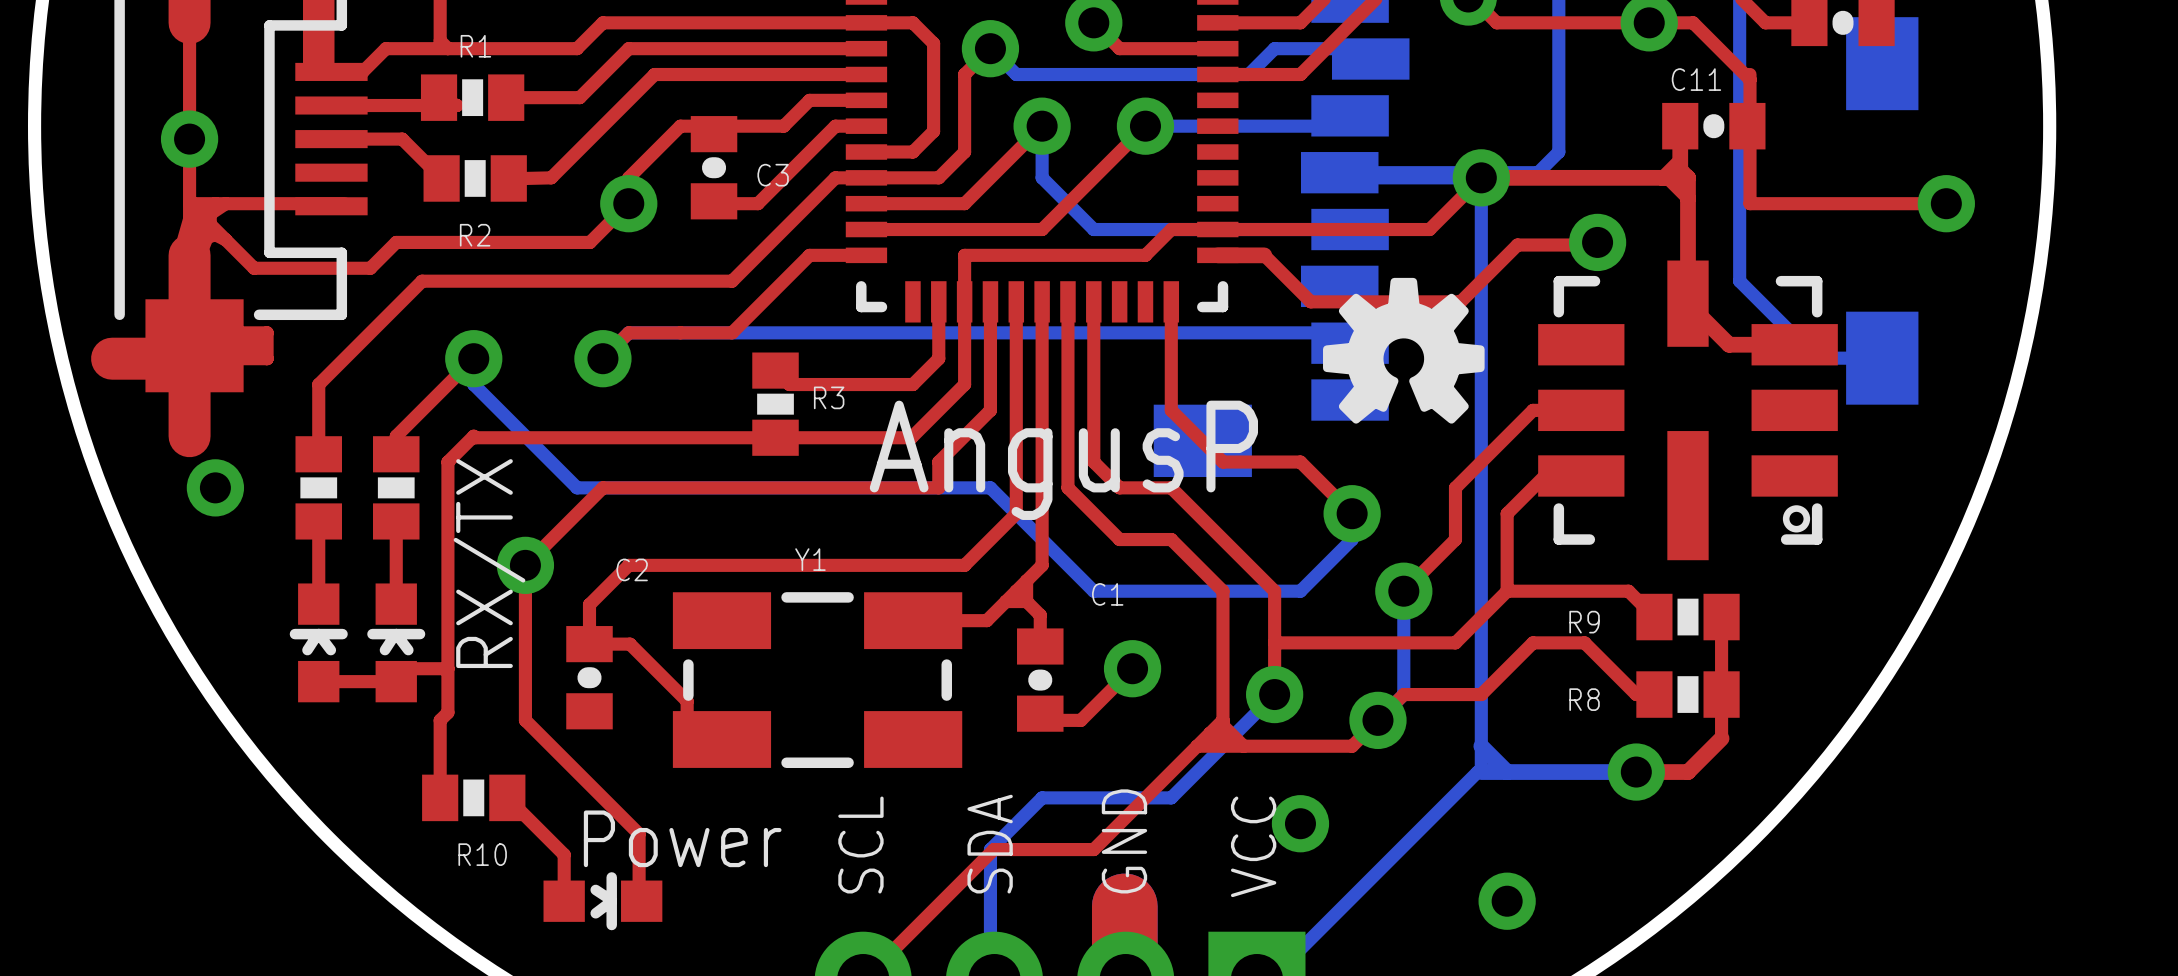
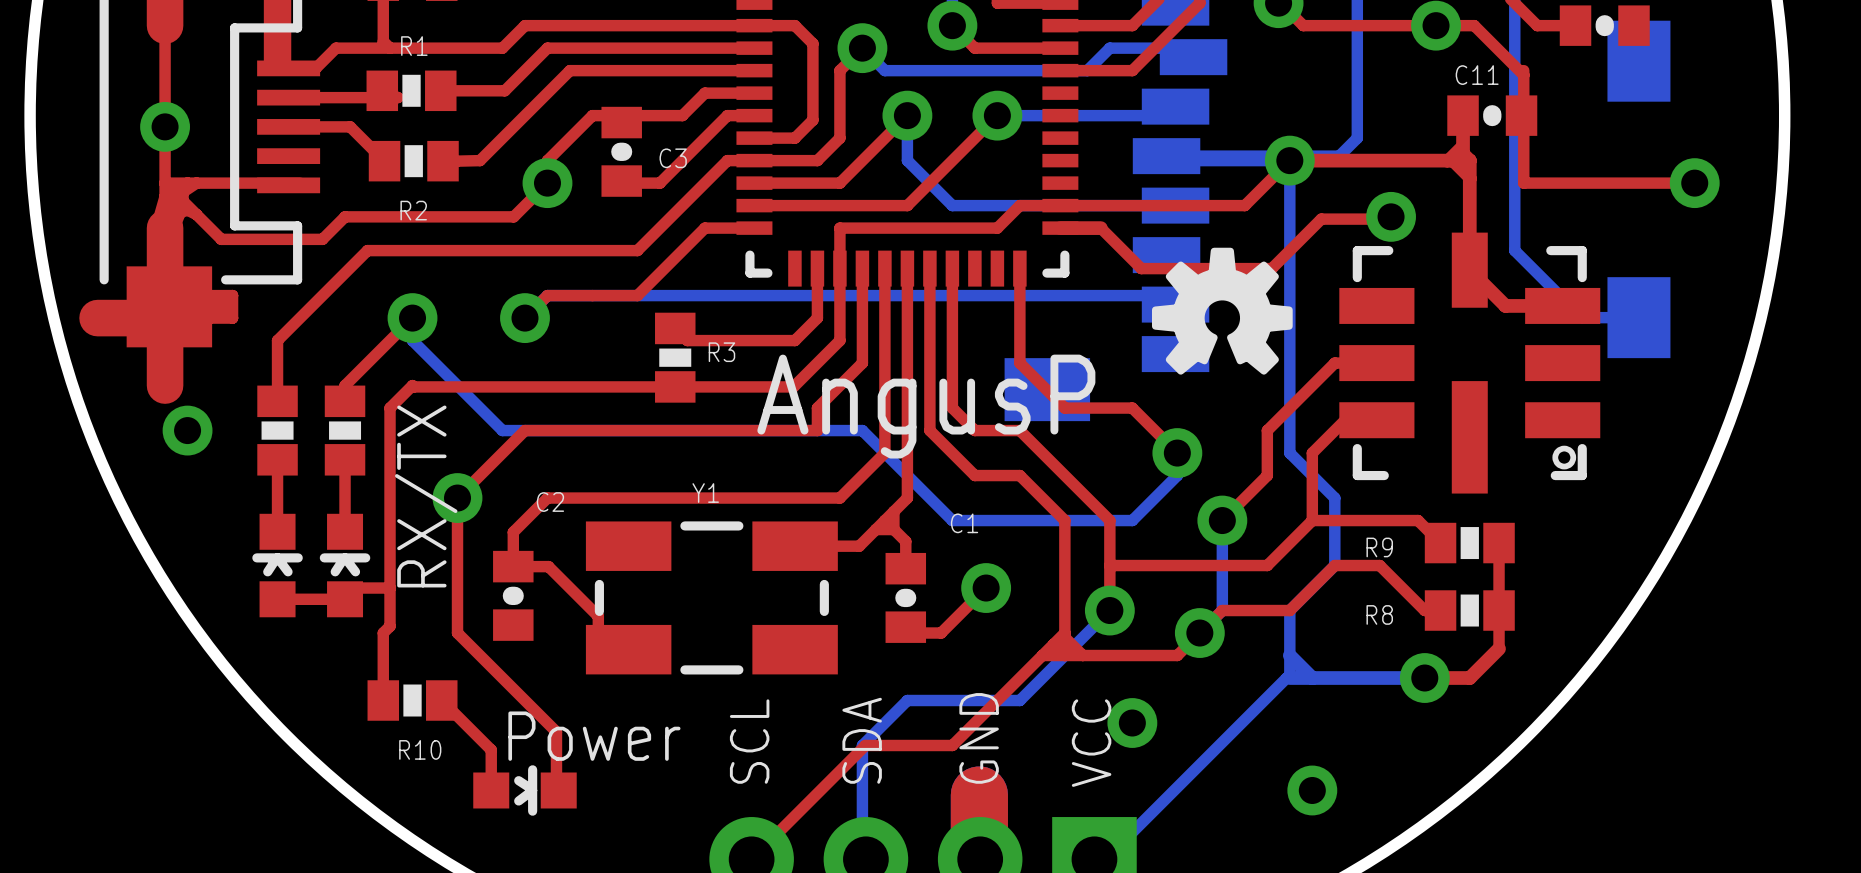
bottom track: (1481, 513) (1481, 694) -> (1289, 453) (1334, 498) (1334, 565) (1289, 610)

